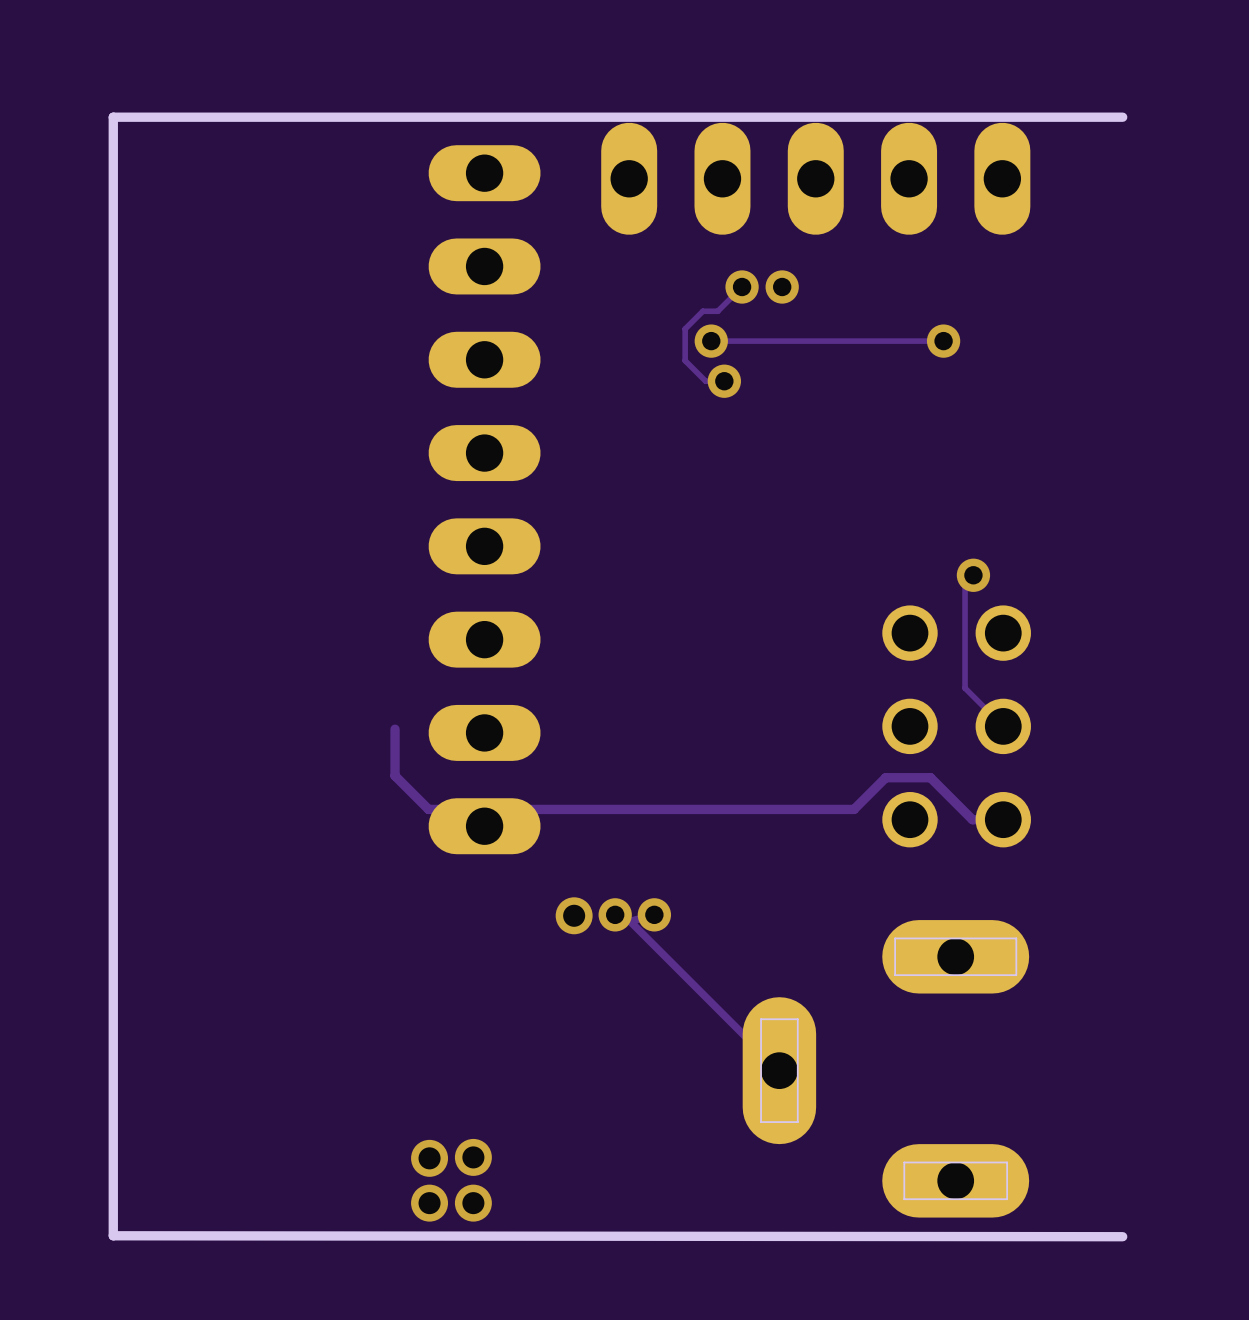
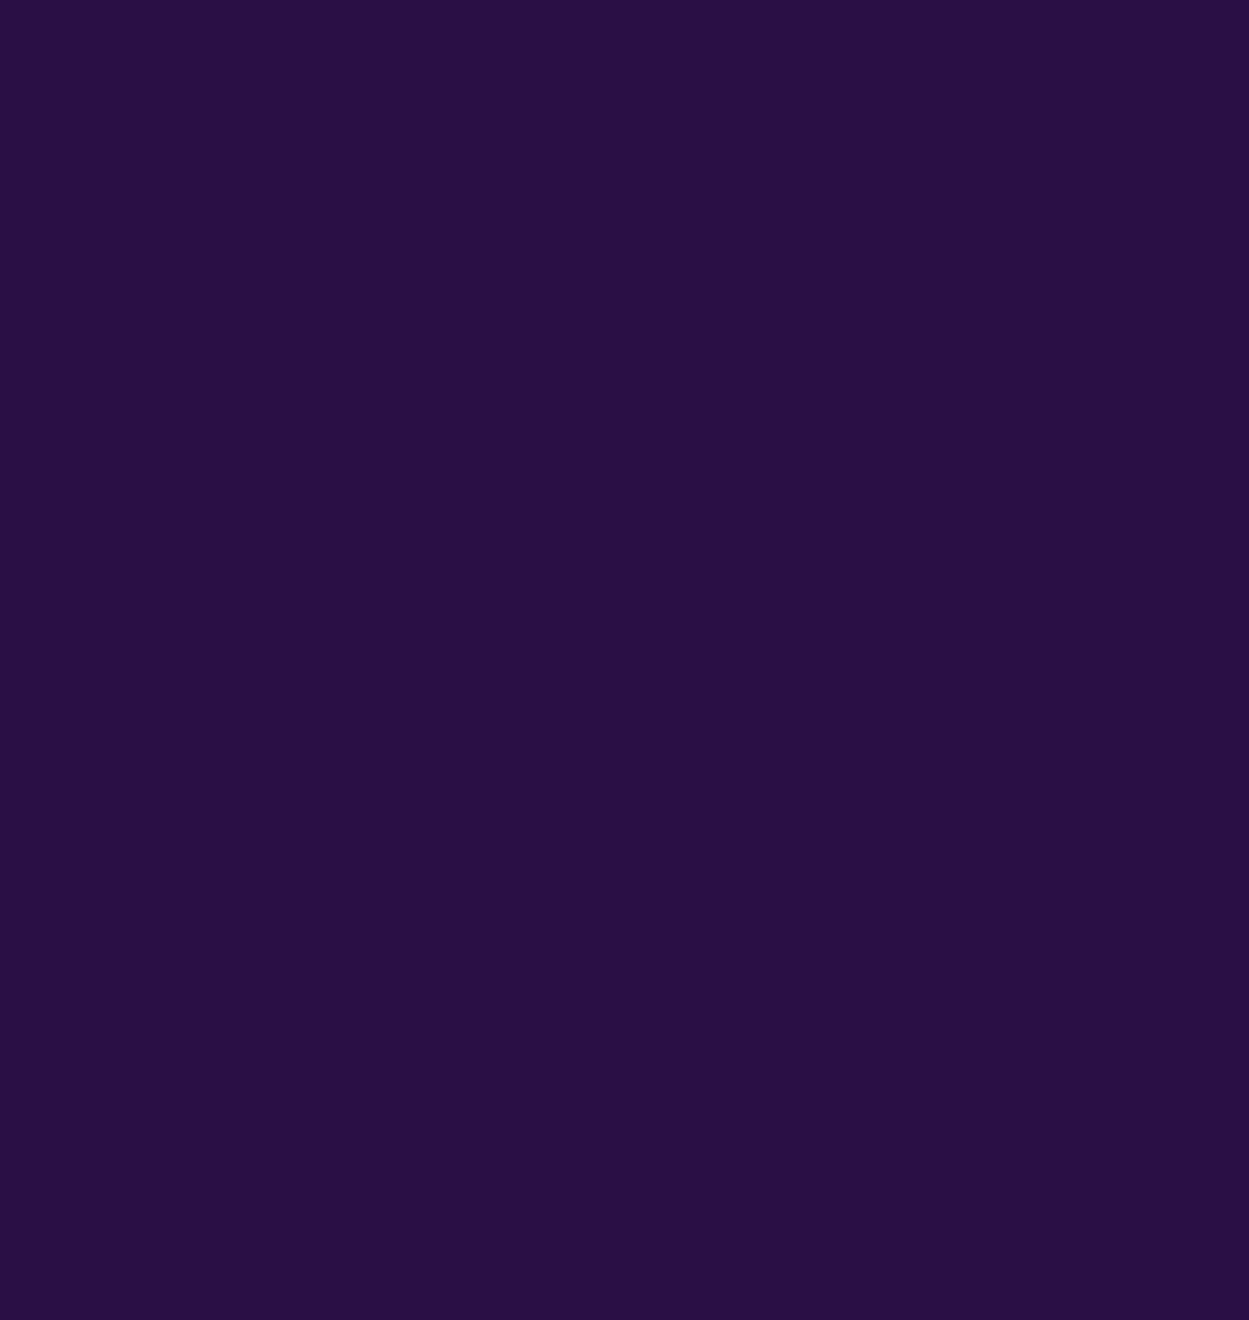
board edge: (1122, 117) (113, 117) (113, 1235) (1122, 1236) -> none
part: (815, 178) -> none
track: (742, 287) (717, 311) (702, 311) (685, 328) (685, 360) (705, 381) (724, 381) -> none
via: (742, 287) -> none
via: (782, 287) -> none
via: (711, 341) -> none
track: (943, 341) (711, 341) -> none
via: (943, 341) -> none
via: (724, 381) -> none
part: (484, 499) -> none
track: (973, 575) (965, 575) (965, 688) (1003, 726) -> none
via: (973, 575) -> none
part: (956, 726) -> none
track: (395, 729) (395, 775) (428, 809) (854, 809) (885, 777) (930, 777) (972, 819) (1003, 819) -> none
via: (615, 914) -> none
track: (654, 914) (630, 921) (779, 1070) -> none
via: (654, 914) -> none
via: (574, 915) -> none
part: (885, 1068) -> none
via: (473, 1157) -> none
via: (429, 1158) -> none
via: (429, 1203) -> none
via: (473, 1203) -> none

